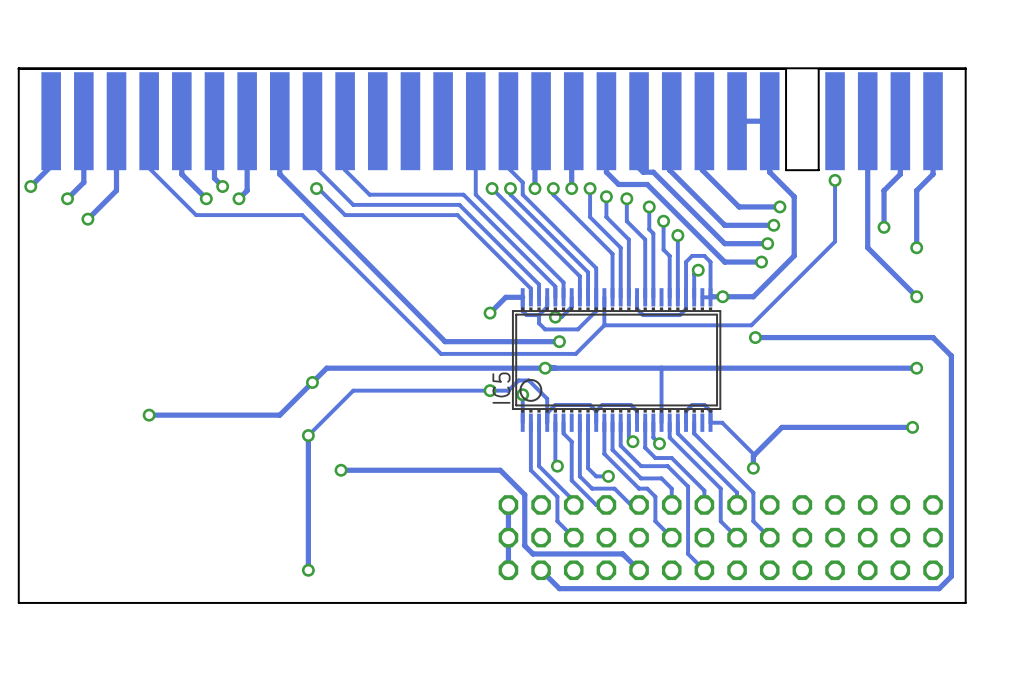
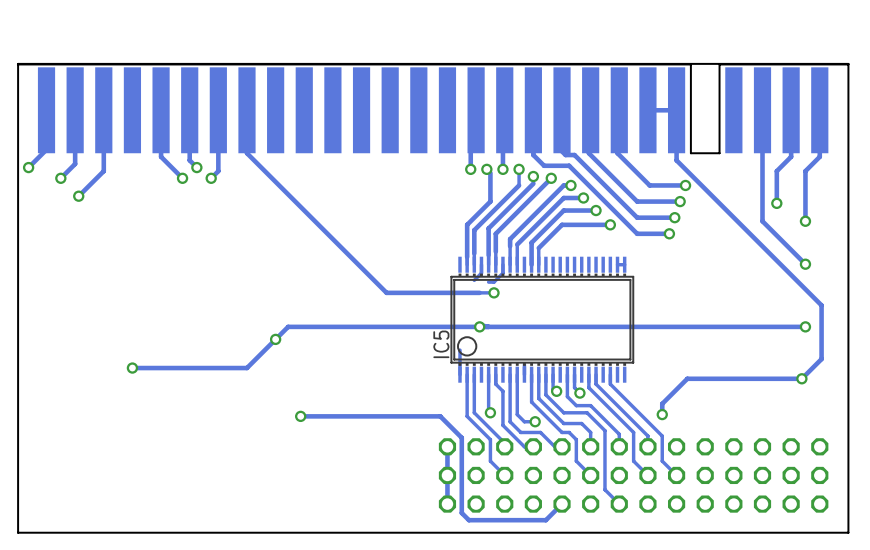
track: (149, 121) (149, 168) (196, 215) (302, 215) (441, 353) (575, 353) (604, 325) -> none
track: (312, 121) (312, 164) (353, 204) (459, 204) (539, 284) -> none
track: (345, 121) (345, 170) (369, 194) (463, 194) (555, 286) -> none
track: (475, 121) (475, 194) (563, 282) -> none
track: (508, 121) (508, 168) (522, 182) (522, 194) (596, 268) (596, 311) (577, 329) (561, 329) -> none
track: (279, 170) (279, 174) (445, 341) (559, 341) -> (246, 153) (386, 292) (479, 292)
track: (769, 172) (794, 196) (794, 255) (753, 296) (710, 297) (710, 262) (704, 255) (692, 255) (686, 262) (686, 309) (679, 315) (643, 315) (637, 309) (637, 297) -> (676, 155) (676, 160) (821, 305) (821, 359) (801, 378)
track: (835, 180) (835, 241) (751, 325) (604, 325) -> none
via: (835, 180) -> none
track: (316, 188) (345, 215) (457, 215) (530, 288) -> (490, 172) (490, 201) (467, 224) (467, 257)
via: (316, 188) -> none
track: (492, 188) (579, 276) -> none
via: (492, 188) -> none
track: (510, 188) (510, 194) (588, 274) -> none
via: (510, 188) -> none
track: (553, 188) (553, 194) (612, 253) (612, 278) -> (610, 224) (562, 224) (538, 248)
track: (626, 198) (626, 221) (645, 239) (645, 297) -> (551, 178) (495, 233) (495, 251)
track: (606, 204) (606, 217) (628, 239) (628, 297) -> (533, 183) (488, 228) (488, 255)
track: (590, 206) (590, 217) (620, 247) (620, 297) -> (519, 185) (474, 230) (474, 253)
track: (649, 206) (649, 229) (653, 233) (653, 297) -> (570, 185) (563, 185) (510, 239) (510, 246)
track: (663, 221) (663, 249) (669, 255) (669, 297) -> (583, 197) (563, 197) (517, 244)
track: (677, 235) (677, 297) -> none
track: (698, 270) (694, 274) (694, 297) -> none
via position: (698, 270) -> (610, 224)
via: (722, 296) -> none
track: (604, 297) (604, 325) -> (531, 264) (531, 242) (563, 210) (597, 210)
track: (490, 313) (505, 297) (522, 297) (522, 311) (526, 315) (539, 315) (539, 323) (545, 329) -> none
via: (490, 313) -> none
via: (555, 317) -> none
via: none -> (494, 292)
track: (755, 337) (933, 337) (951, 355) (951, 576) (939, 588) (620, 588) -> none
via: (755, 337) -> none
via: (559, 341) -> none
track: (661, 368) (661, 422) -> none
via: (490, 390) -> none
via: (522, 394) -> none
track: (547, 413) (555, 404) (590, 404) (596, 411) (602, 404) (630, 404) (637, 411) (637, 422) -> none
track: (547, 422) (547, 398) (528, 380) (518, 380) (508, 390) (353, 390) (308, 435) (308, 570) -> none
track: (686, 422) (686, 411) (692, 404) (704, 404) (710, 411) (710, 422) (722, 422) (754, 454) -> none
via: (308, 435) -> none
track: (524, 545) (532, 553) (622, 553) (639, 570) -> (545, 520) (562, 504)
via: (308, 570) -> none
track: (541, 570) (559, 588) -> (461, 482) (461, 513) (468, 520) (492, 520)

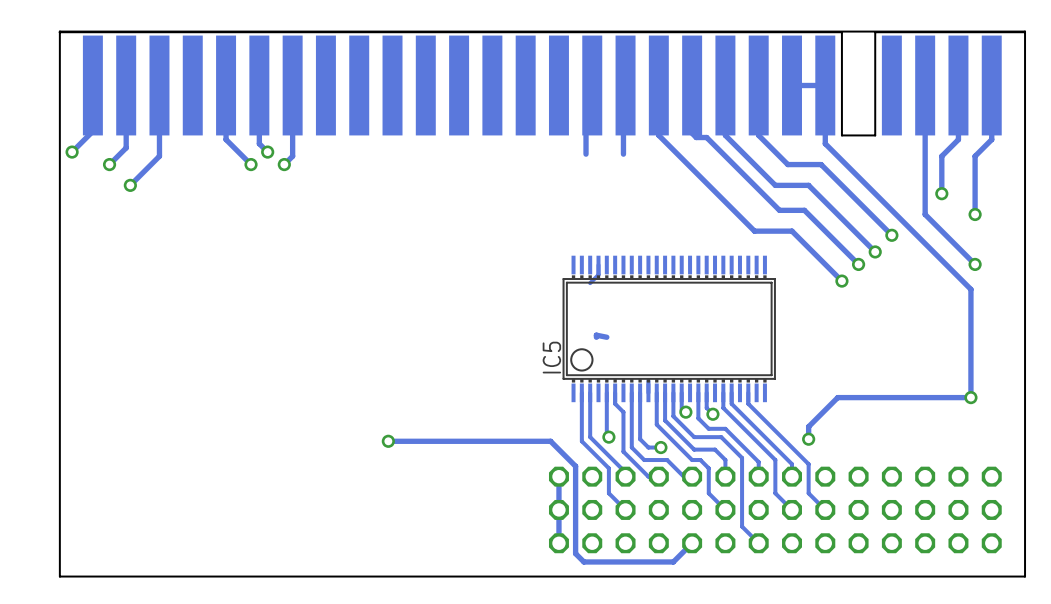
track: (246, 110) (246, 153) (386, 292) (494, 292) -> none
track: (590, 110) (588, 112) (588, 153) (637, 201) (680, 201) -> (725, 85) (725, 135) (775, 185) (808, 185) (875, 251)
track: (619, 110) (617, 112) (617, 153) (649, 185) (685, 185) -> (758, 85) (758, 135) (787, 164) (821, 164) (891, 235)
track: (533, 153) (544, 165) (569, 165) (637, 233) (669, 233) -> (658, 135) (754, 231) (792, 231) (841, 281)
via: (470, 169) -> none
via: (486, 169) -> none
via: (502, 169) -> none
track: (519, 169) (519, 185) (474, 230) (474, 264) -> none
via: (519, 169) -> none
track: (490, 172) (490, 201) (467, 224) (467, 264) -> none
track: (533, 176) (533, 183) (488, 228) (488, 264) -> none
via: (533, 176) -> none
track: (551, 178) (495, 233) (495, 264) -> none
via: (551, 178) -> none
track: (570, 185) (563, 185) (510, 239) (510, 264) -> none
via: (570, 185) -> none
via: (685, 185) -> none
track: (583, 197) (563, 197) (517, 244) (517, 264) -> none
via: (583, 197) -> none
via: (680, 201) -> none
via: (596, 210) -> none
track: (597, 210) (563, 210) (531, 242) (531, 264) -> none
track: (674, 217) (658, 217) -> (858, 264) (804, 210)
via: (674, 217) -> none
track: (610, 224) (562, 224) (538, 248) (538, 264) -> none
via: (610, 224) -> none
via: (669, 233) -> none
via: none -> (891, 235)
via: none -> (875, 251)
track: (502, 264) (502, 273) (494, 282) (488, 282) -> none
track: (624, 264) (617, 264) -> none
via: none -> (858, 264)
via: none -> (841, 281)
track: (801, 285) (821, 305) (821, 359) (801, 378) -> (970, 289) (970, 397)
via: (494, 292) -> none
via: (479, 326) -> none
track: (805, 326) (288, 326) (246, 368) (132, 368) -> none
via: (805, 326) -> none
via: (275, 339) -> none
track: (459, 350) (459, 374) -> none
via: (132, 368) -> none

